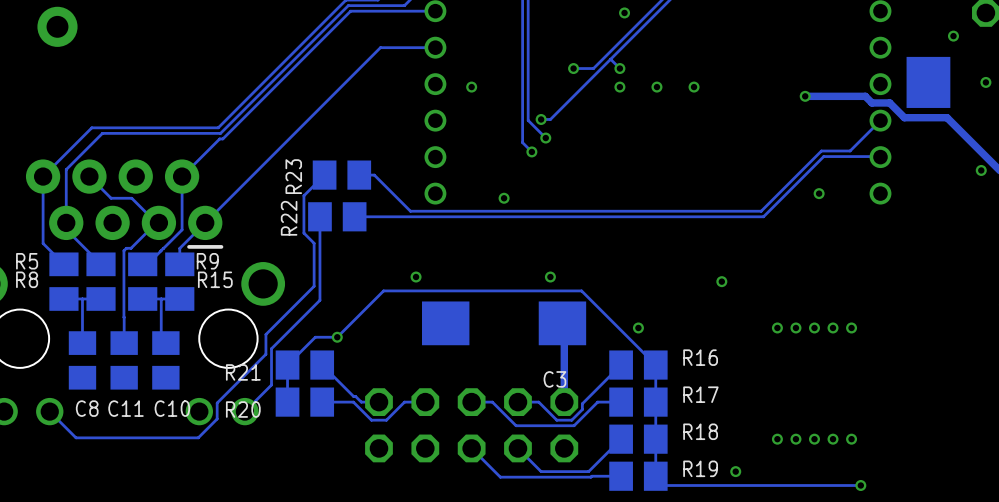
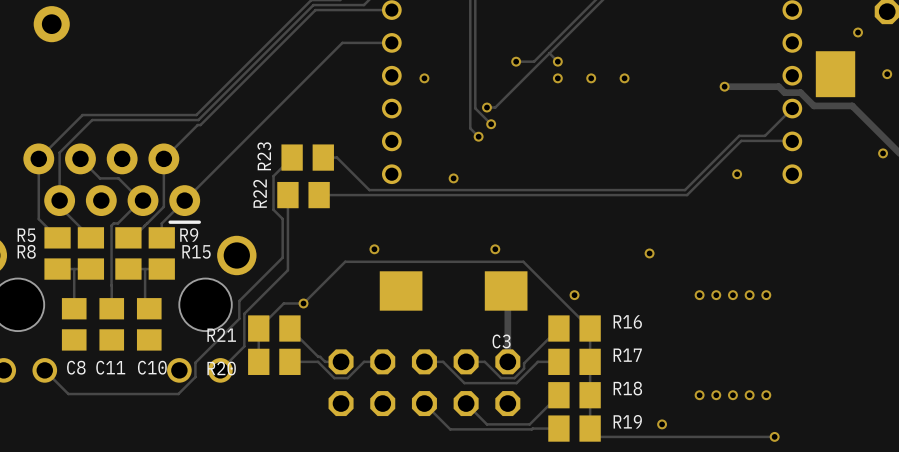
via: (624, 12) -> none

